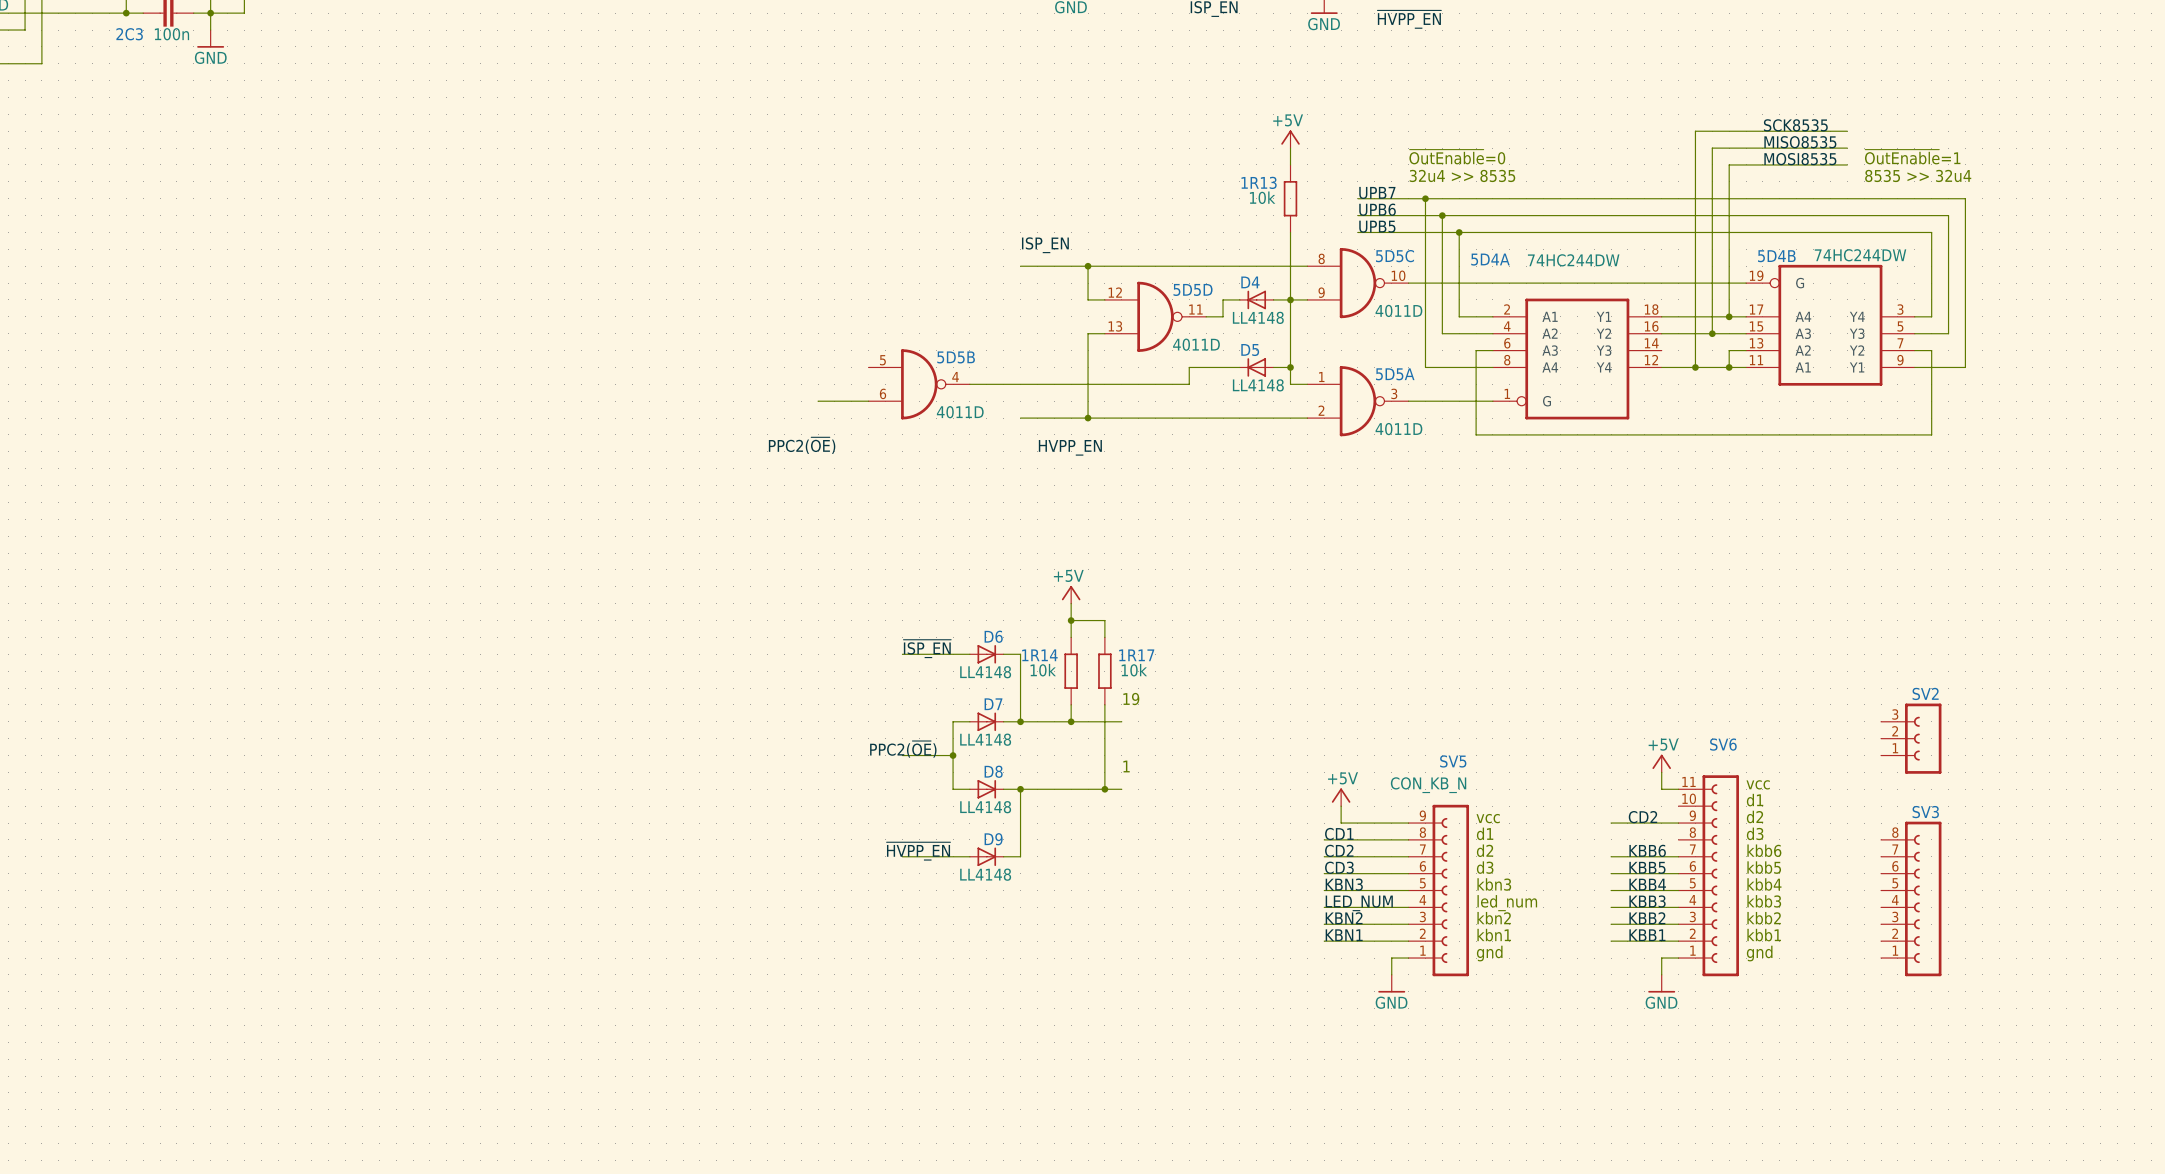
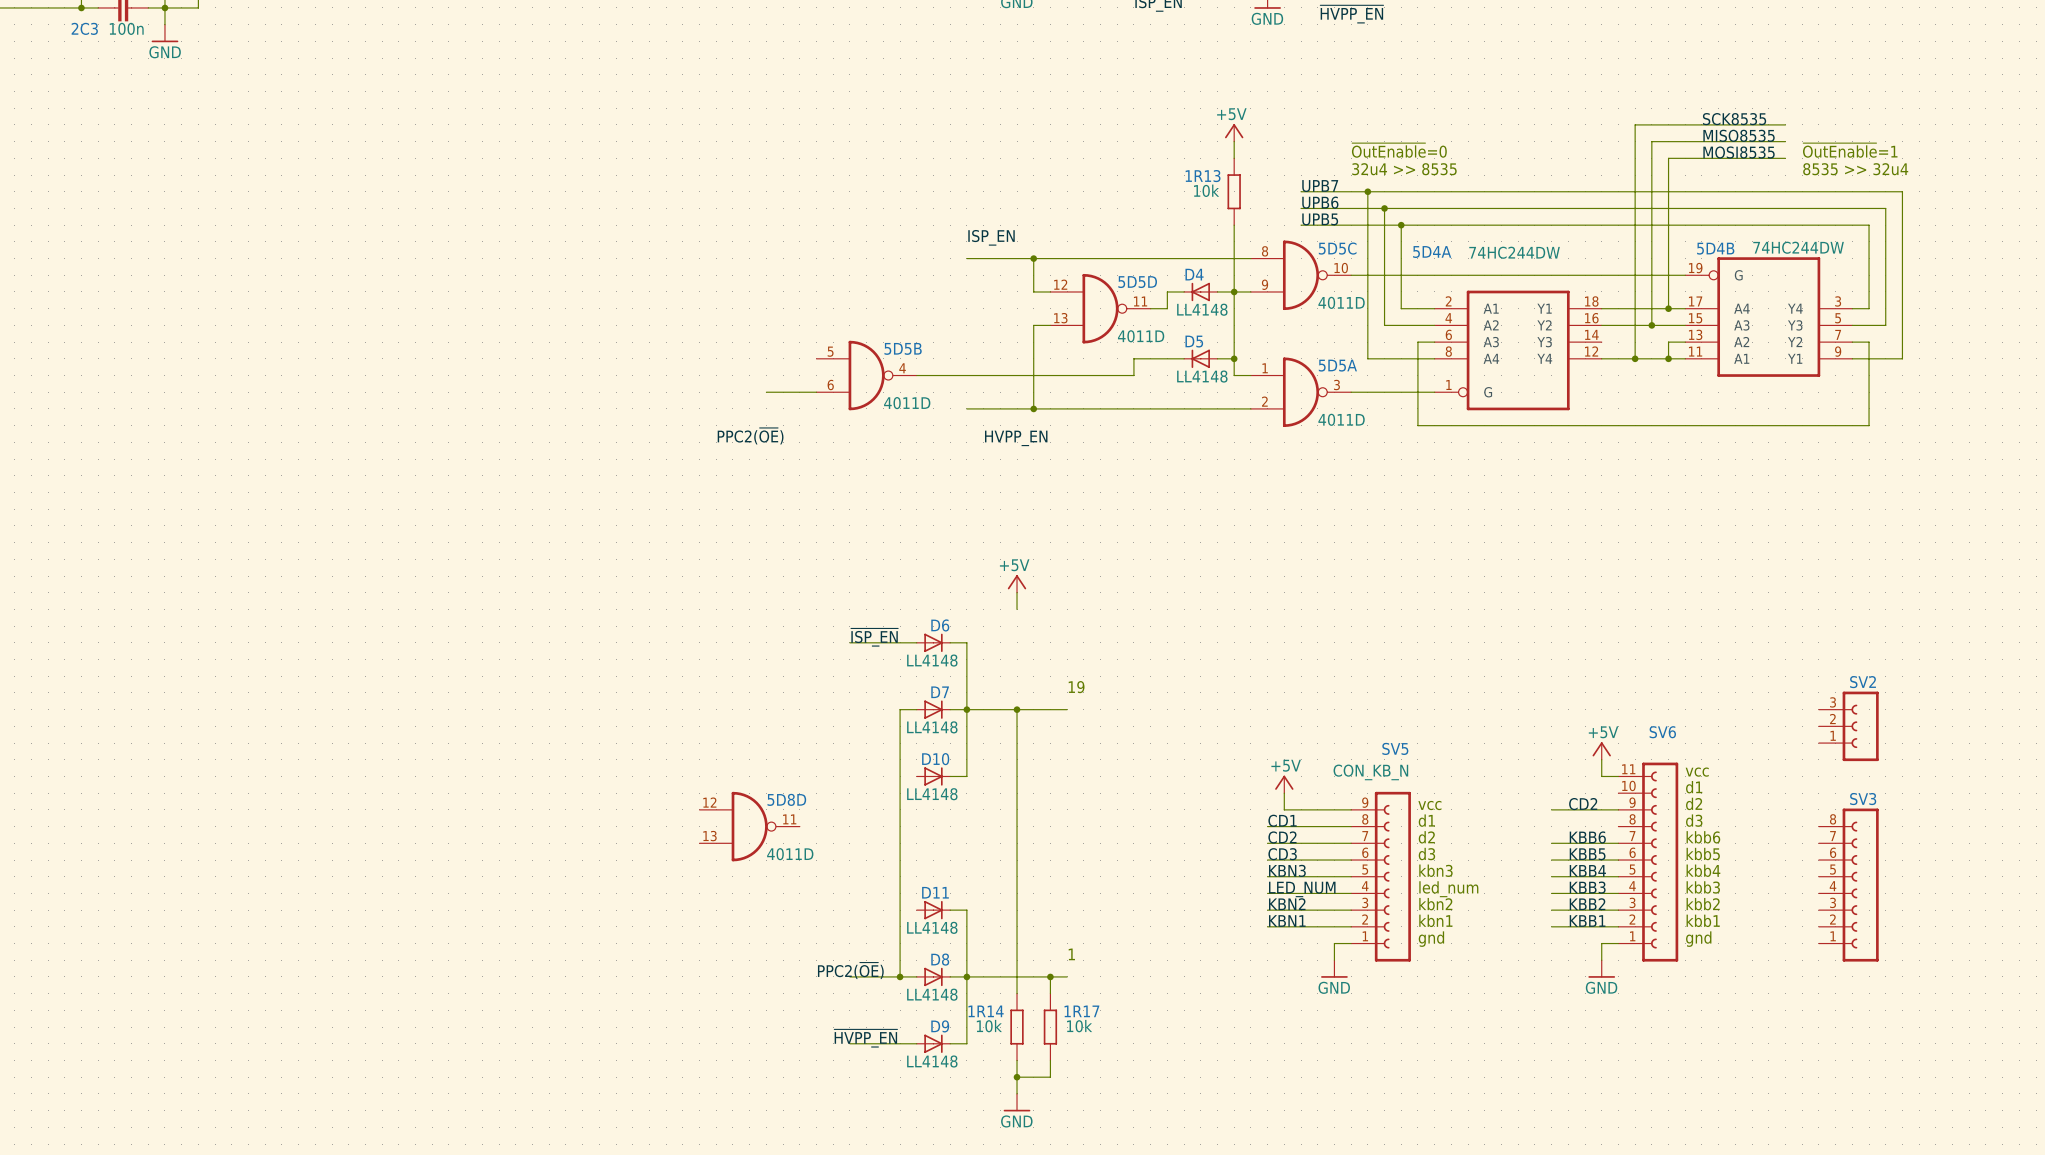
junction: (1071, 620) -> none
wire: (1071, 637) (1071, 620) (1104, 620) (1104, 637) -> none
1R14 position: (1071, 671) -> (1017, 1027)
1R17 position: (1104, 671) -> (1050, 1027)
wire: (1071, 704) (1071, 721) -> (1017, 993) (1017, 709)
wire: (1104, 704) (1104, 789) -> none
wire: none -> (966, 709) (966, 776)
label: PPC2(~{OE}) (903, 749) -> none
wire: (902, 755) (953, 755) -> none
junction: (953, 755) -> none
text: 1 (1126, 766) -> none
D8 name: D8 (993, 771) -> D10 (935, 759)
wire: (953, 789) (969, 789) -> (900, 776) (900, 976)
junction: (1020, 789) -> none
junction: (1104, 789) -> none
wire: (1121, 789) (1020, 789) (1020, 856) (1003, 856) -> none
5D8D: none -> 4011D (749, 826)
label: ~{HVPP_EN} (918, 851) -> none
wire: (902, 856) (969, 856) -> (849, 976) (916, 976)
D9 position: (986, 856) -> (933, 1043)
D11: none -> LL4148 (933, 910)
wire: none -> (950, 910) (966, 910) (966, 1043) (950, 1043)
text: none -> 1 (1071, 954)
label: none -> PPC2(~{OE}) (850, 970)
junction: none -> (900, 976)
D8: none -> LL4148 (933, 976)
wire: none -> (950, 976) (1067, 976)
junction: none -> (966, 976)
wire: none -> (1050, 976) (1050, 993)
junction: none -> (1050, 976)
label: none -> ~{HVPP_EN} (865, 1038)
wire: none -> (849, 1043) (916, 1043)
wire: none -> (1017, 1060) (1017, 1093)
wire: none -> (1050, 1060) (1050, 1077) (1017, 1077)
junction: none -> (1017, 1077)
power symbol: none -> GND (1017, 1102)

